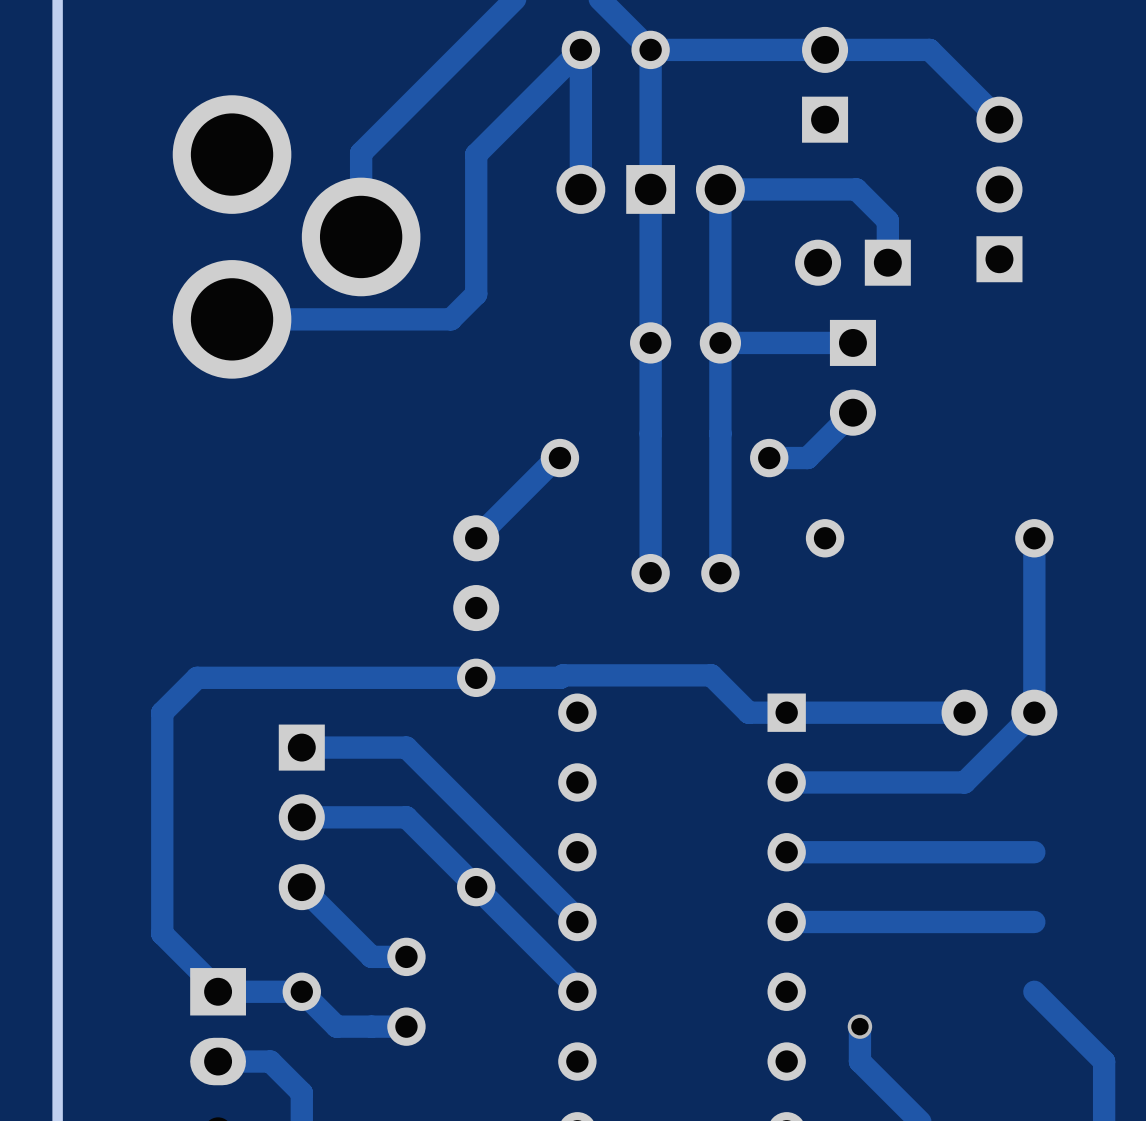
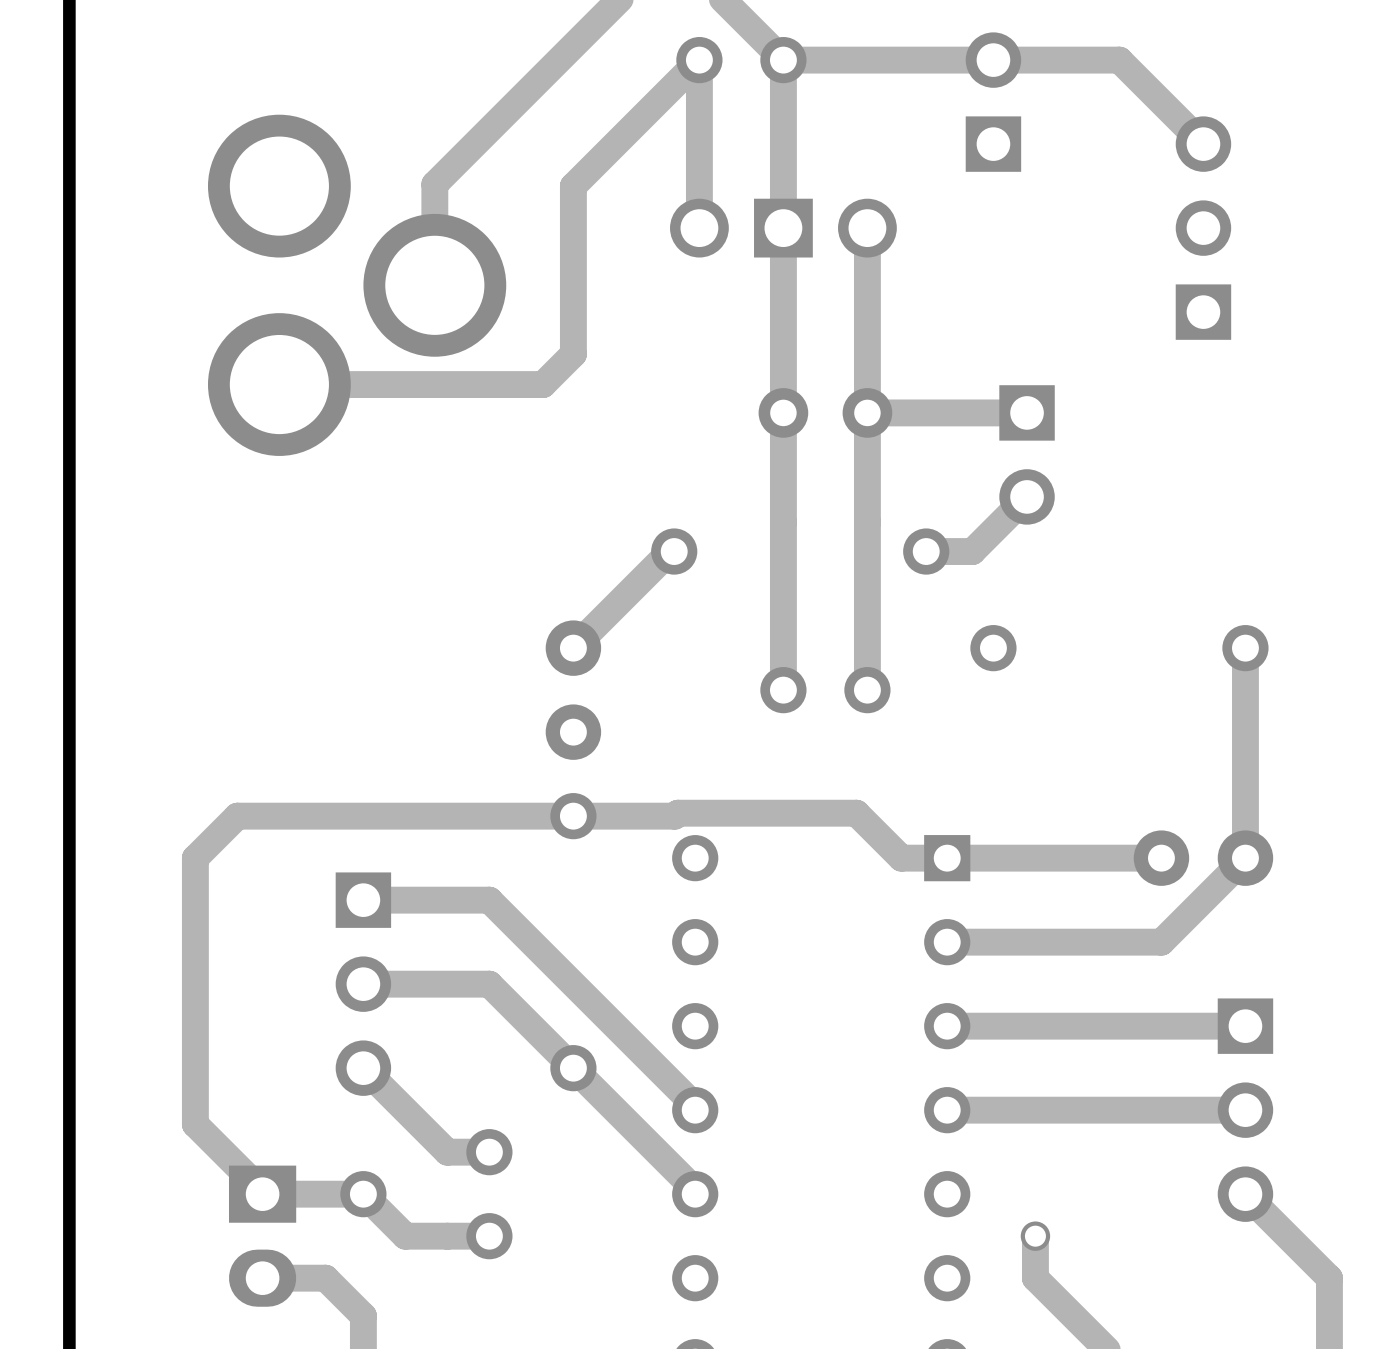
track: (720, 189) (856, 189) (887, 220) (887, 262) -> none
part: (852, 262) -> none
part: none -> (1245, 1110)

